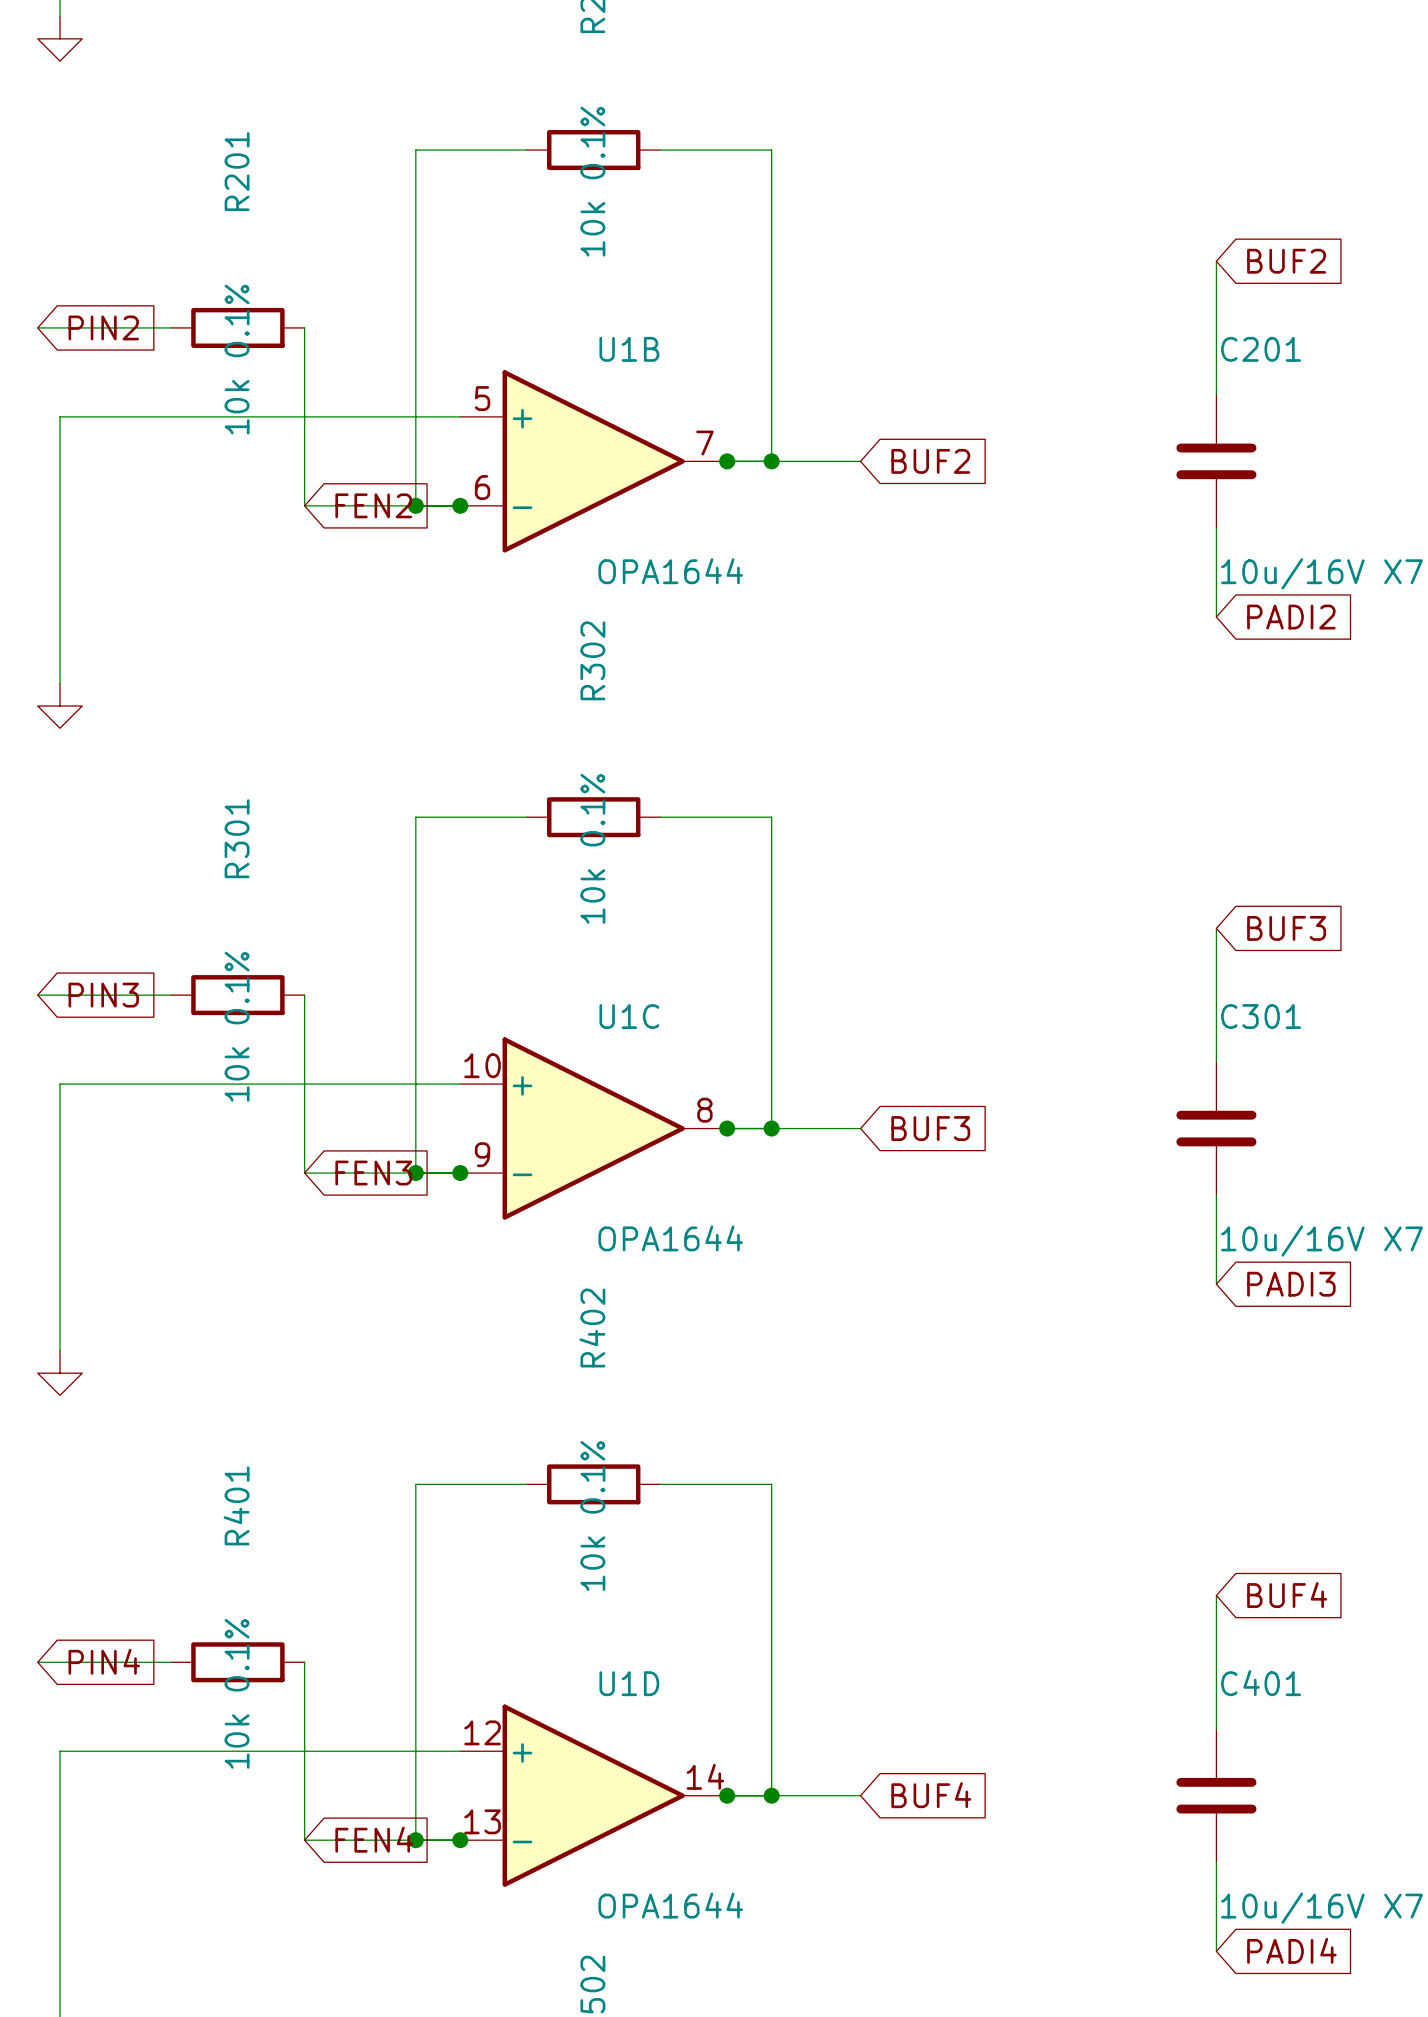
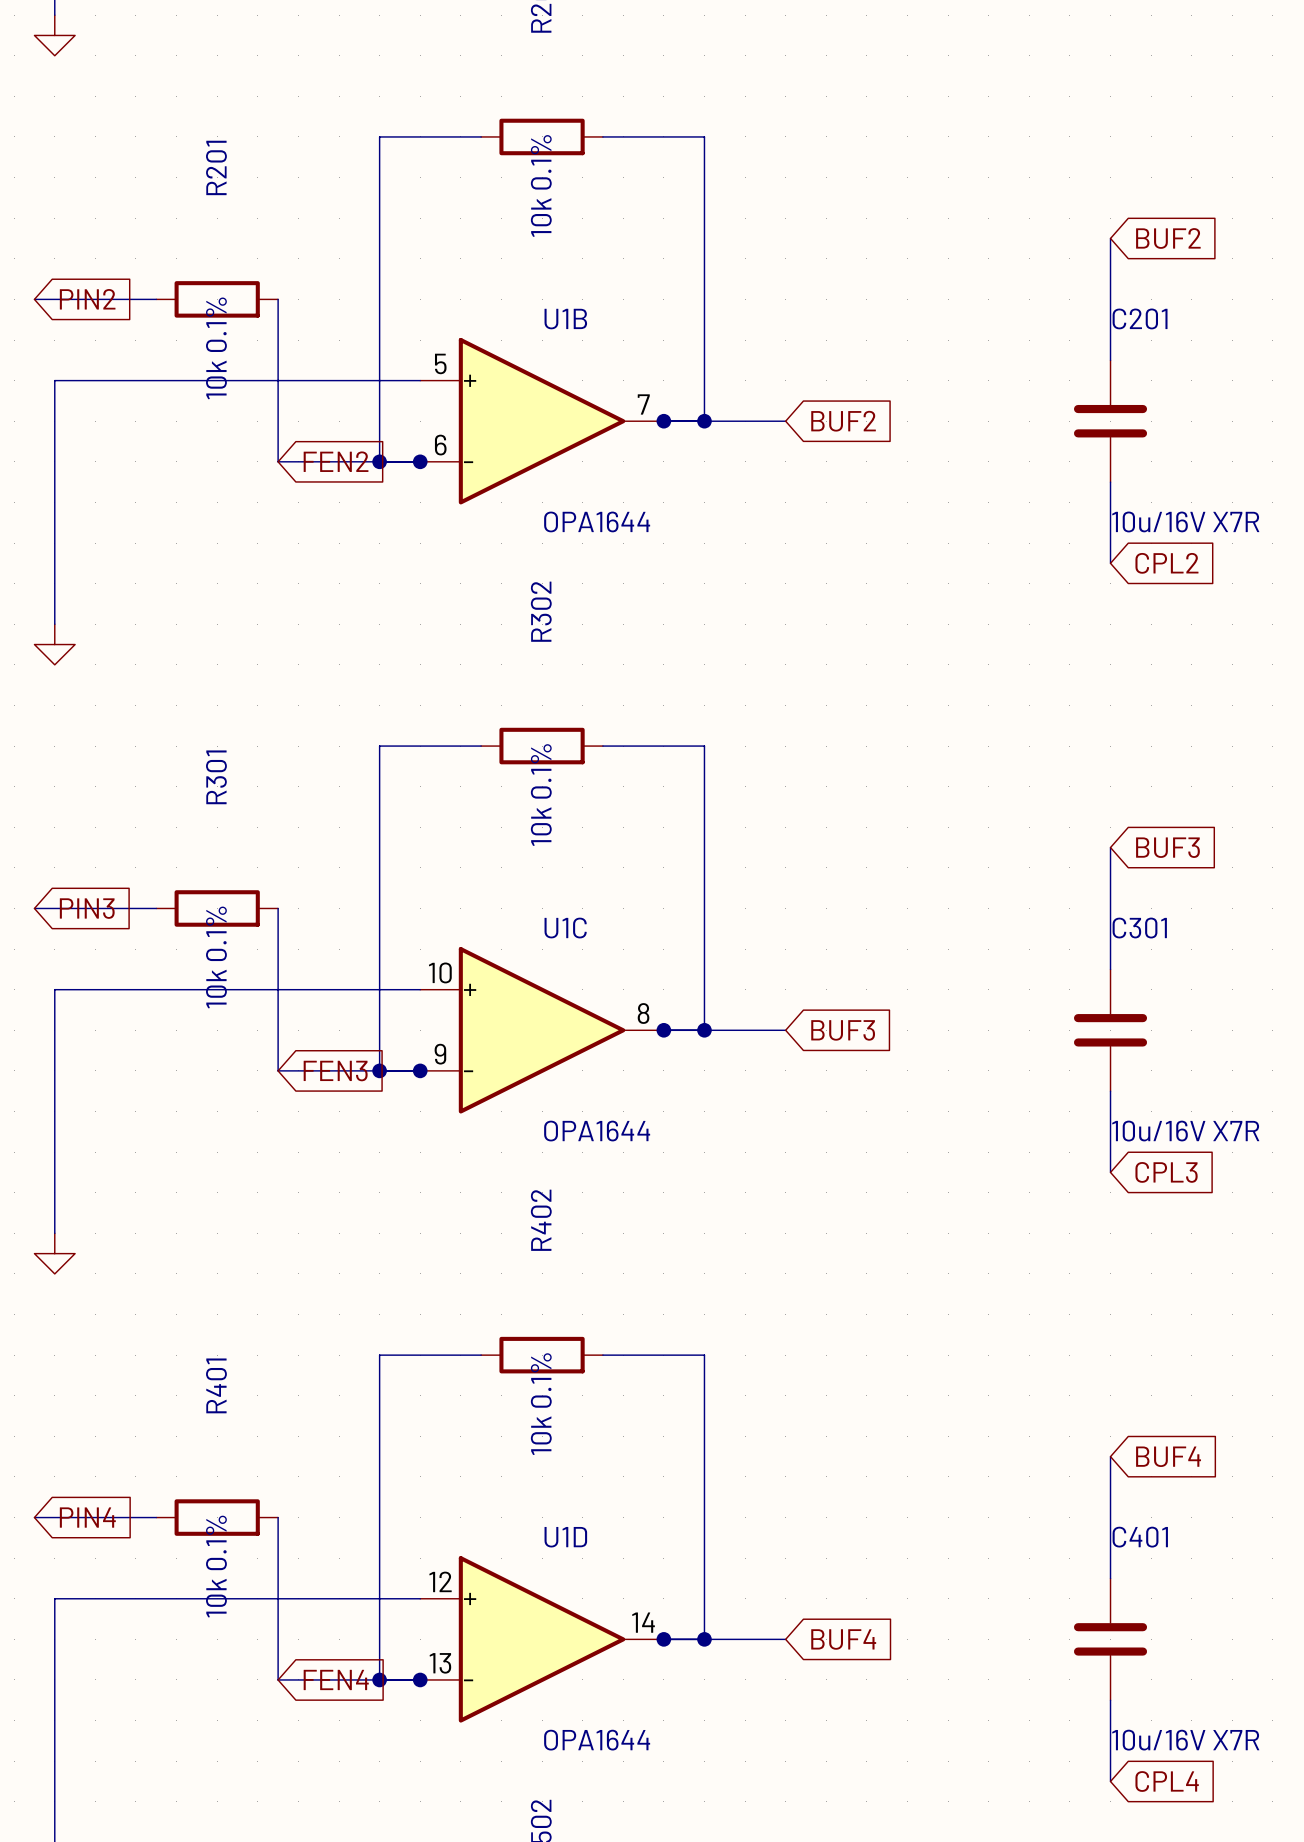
global label: PADI2 (1291, 617) -> CPL2 (1166, 563)
global label: PADI3 (1291, 1284) -> CPL3 (1166, 1172)
global label: PADI4 (1291, 1950) -> CPL4 (1167, 1781)

